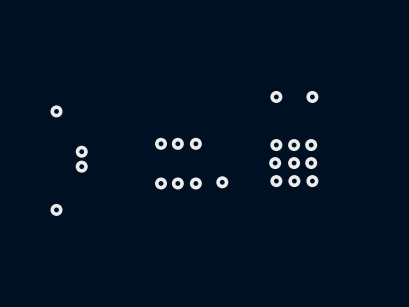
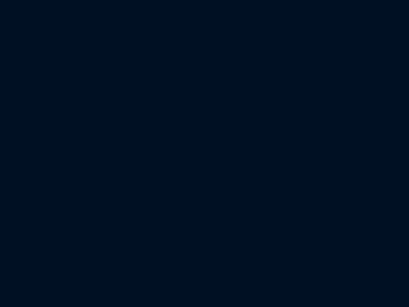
via: (276, 96) -> none
via: (312, 96) -> none
via: (56, 111) -> none
via: (161, 143) -> none
via: (177, 143) -> none
via: (195, 143) -> none
via: (276, 145) -> none
via: (294, 145) -> none
via: (311, 145) -> none
via: (81, 151) -> none
via: (275, 163) -> none
via: (294, 163) -> none
via: (311, 163) -> none
via: (81, 166) -> none
via: (276, 181) -> none
via: (294, 181) -> none
via: (312, 181) -> none
via: (222, 182) -> none
via: (161, 183) -> none
via: (177, 183) -> none
via: (195, 183) -> none
via: (56, 209) -> none

